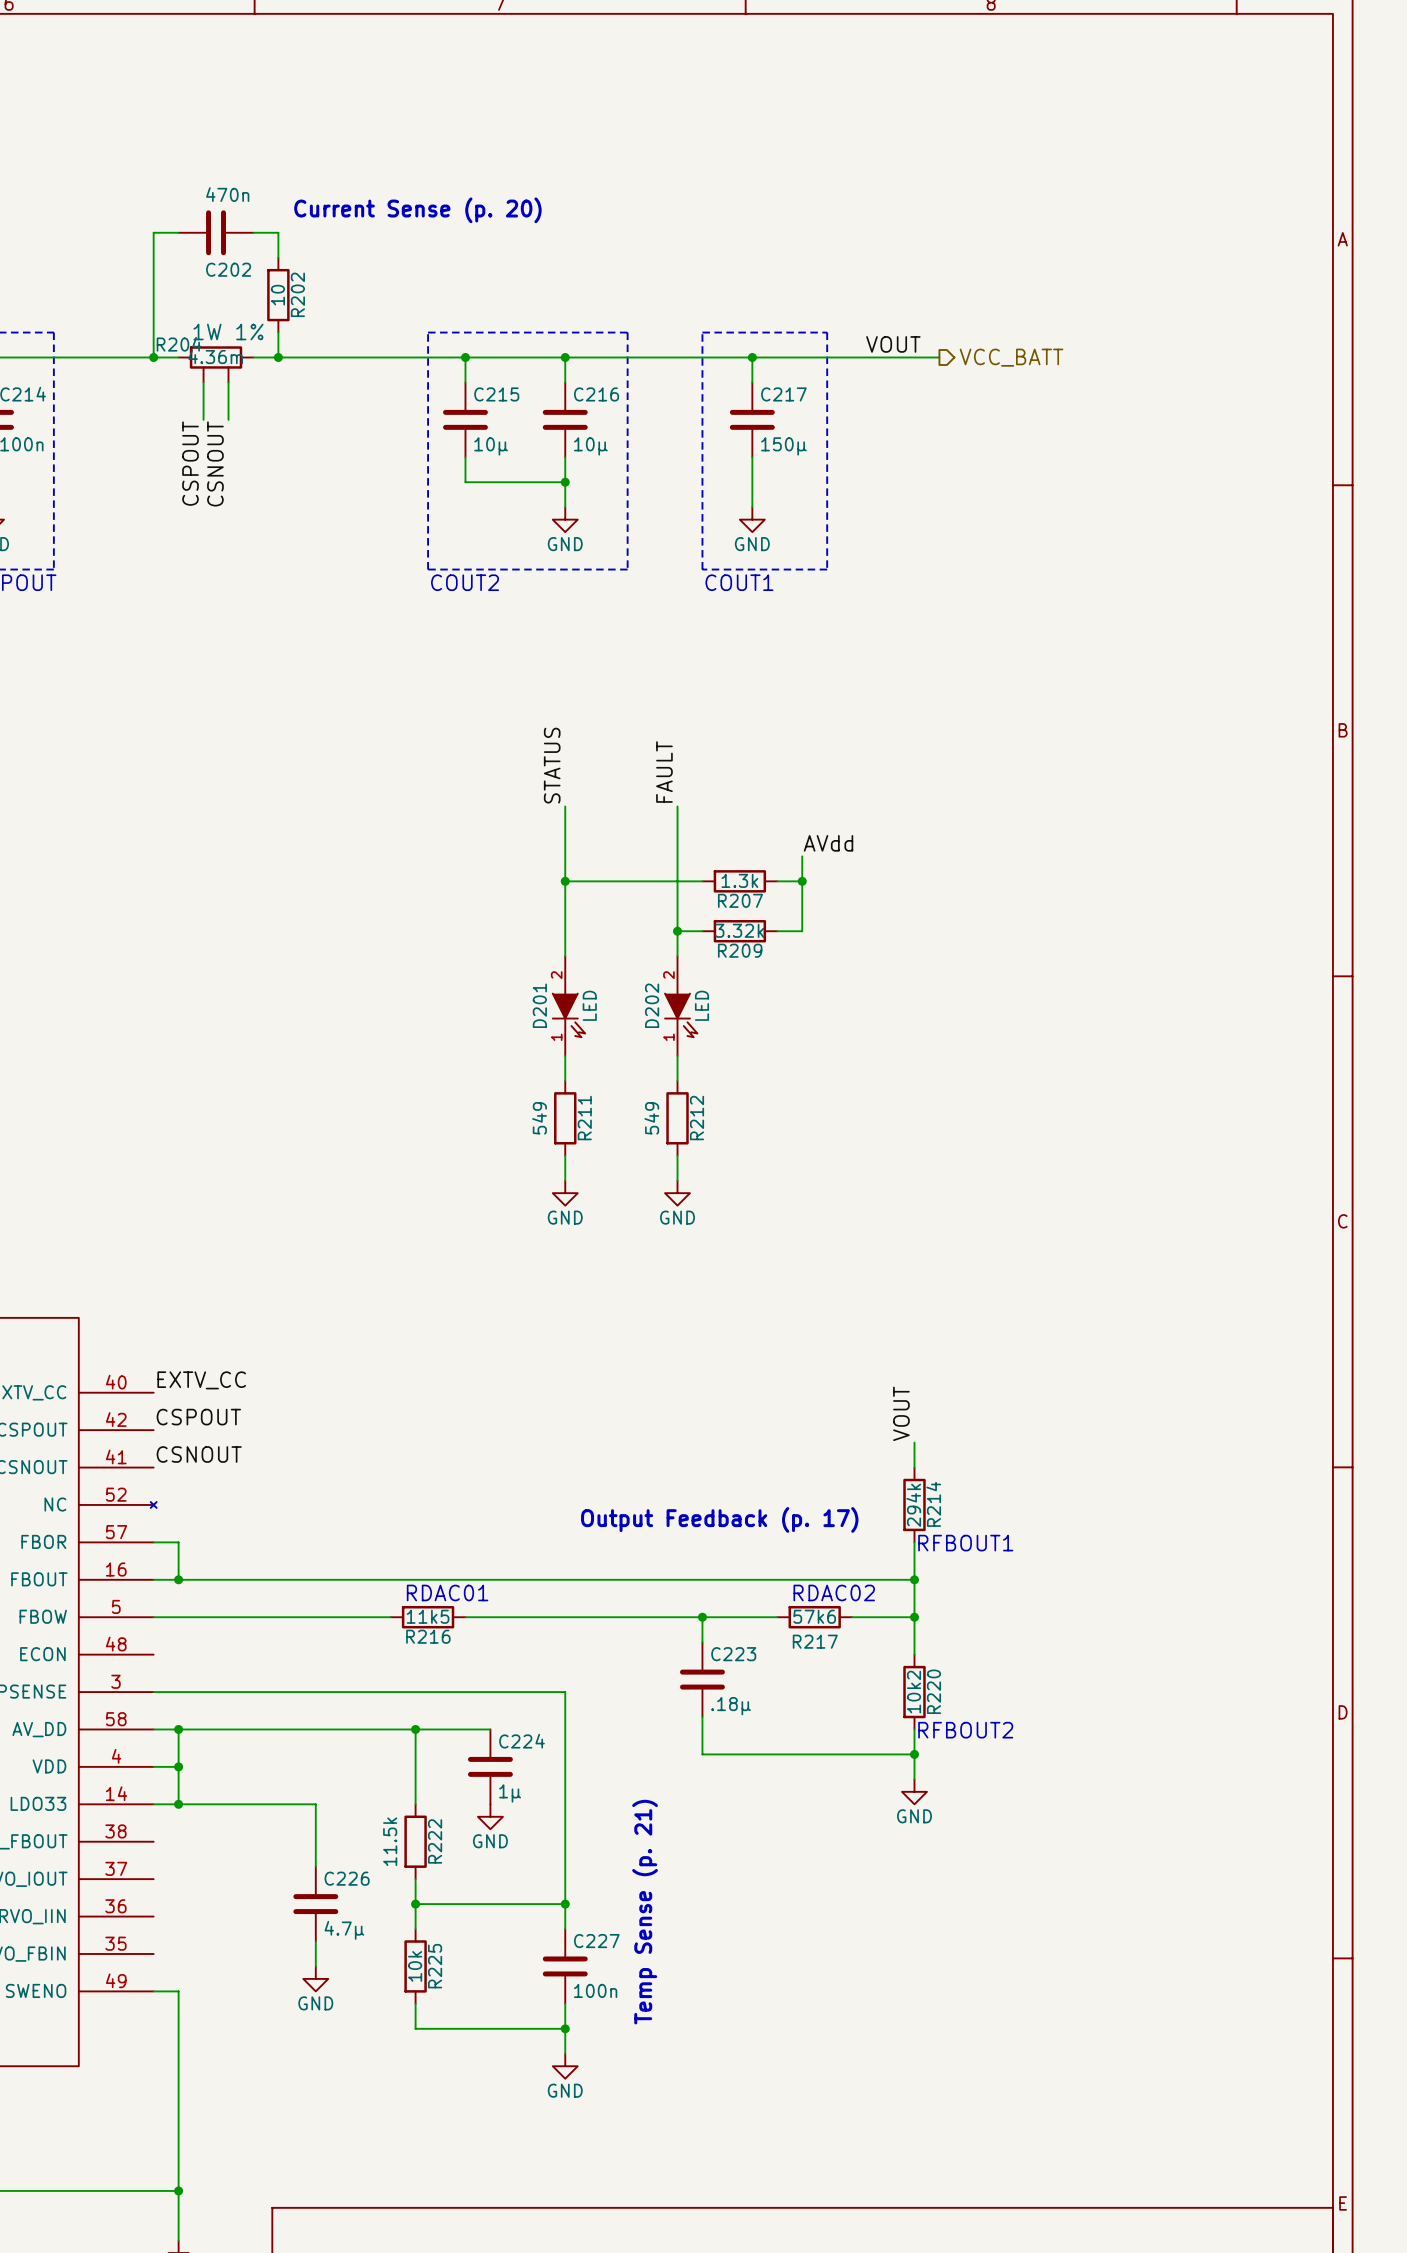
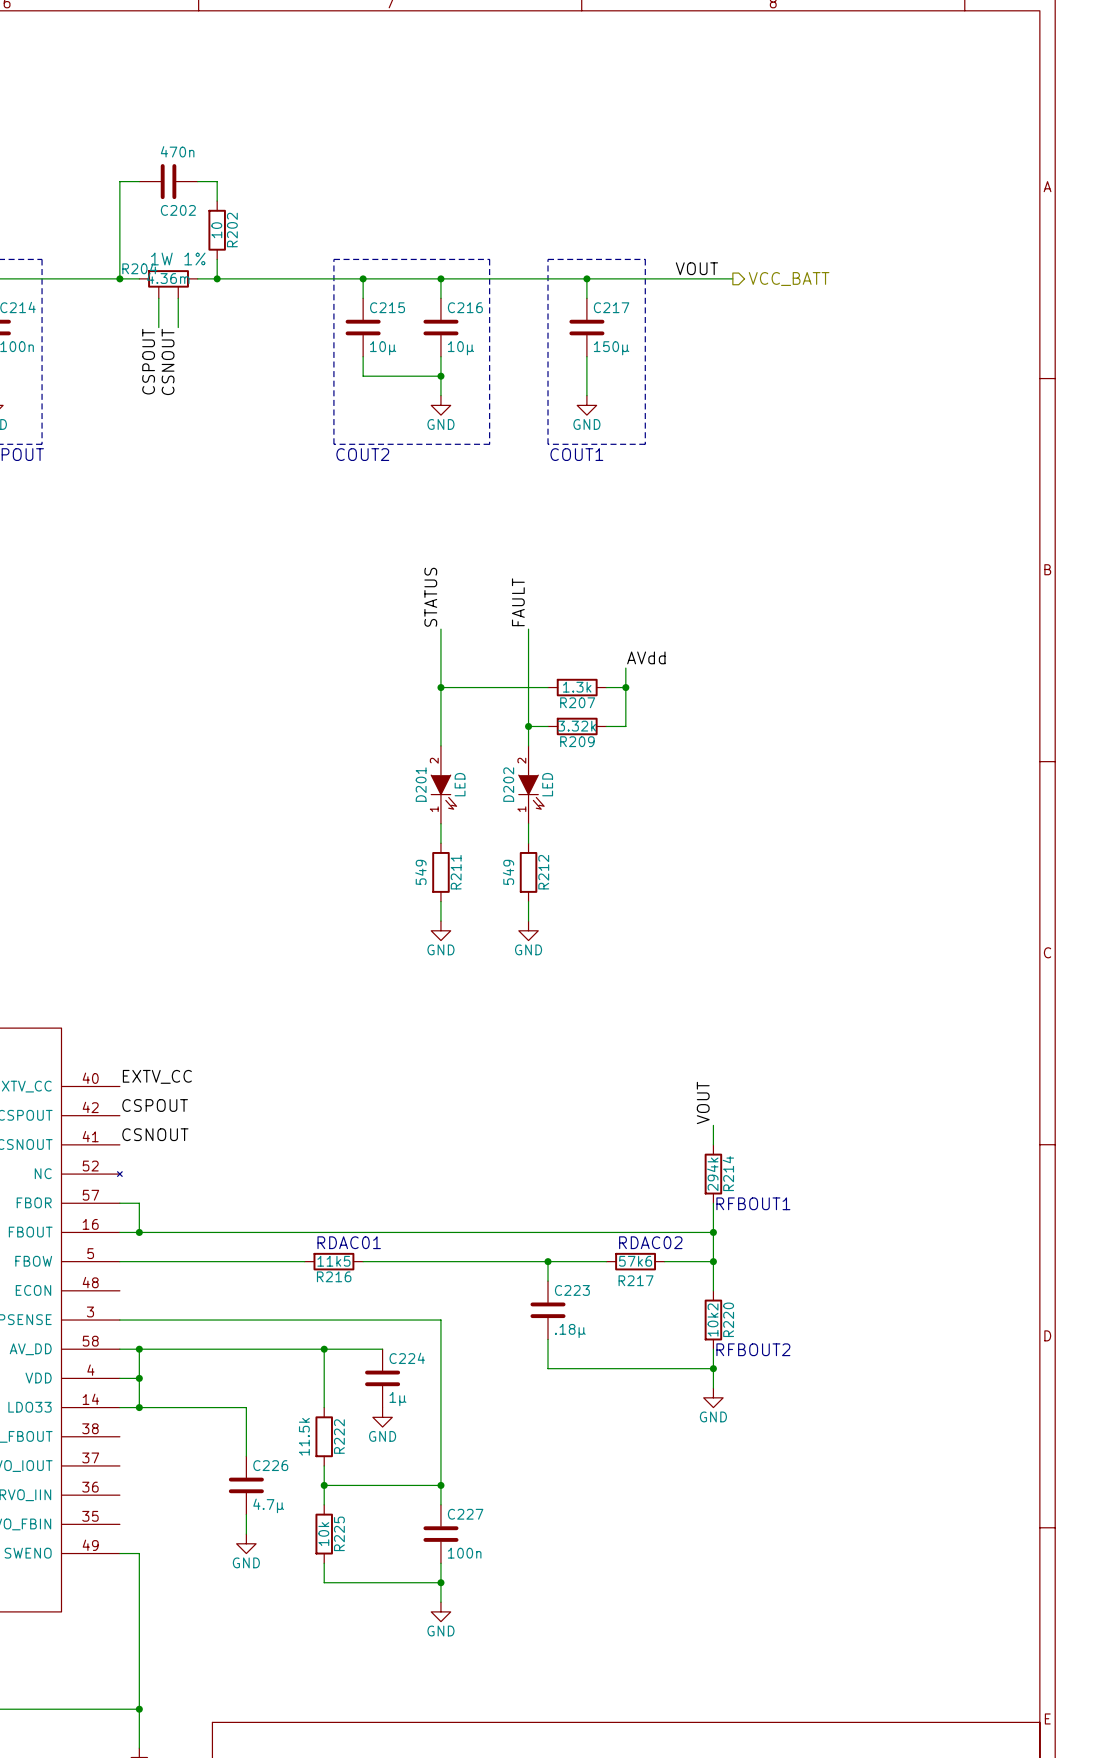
text: Current Sense (p. 20) (417, 210) -> none
text: Output Feedback (p. 17) (719, 1519) -> none
text: Temp Sense (p. 21) (645, 1912) -> none

